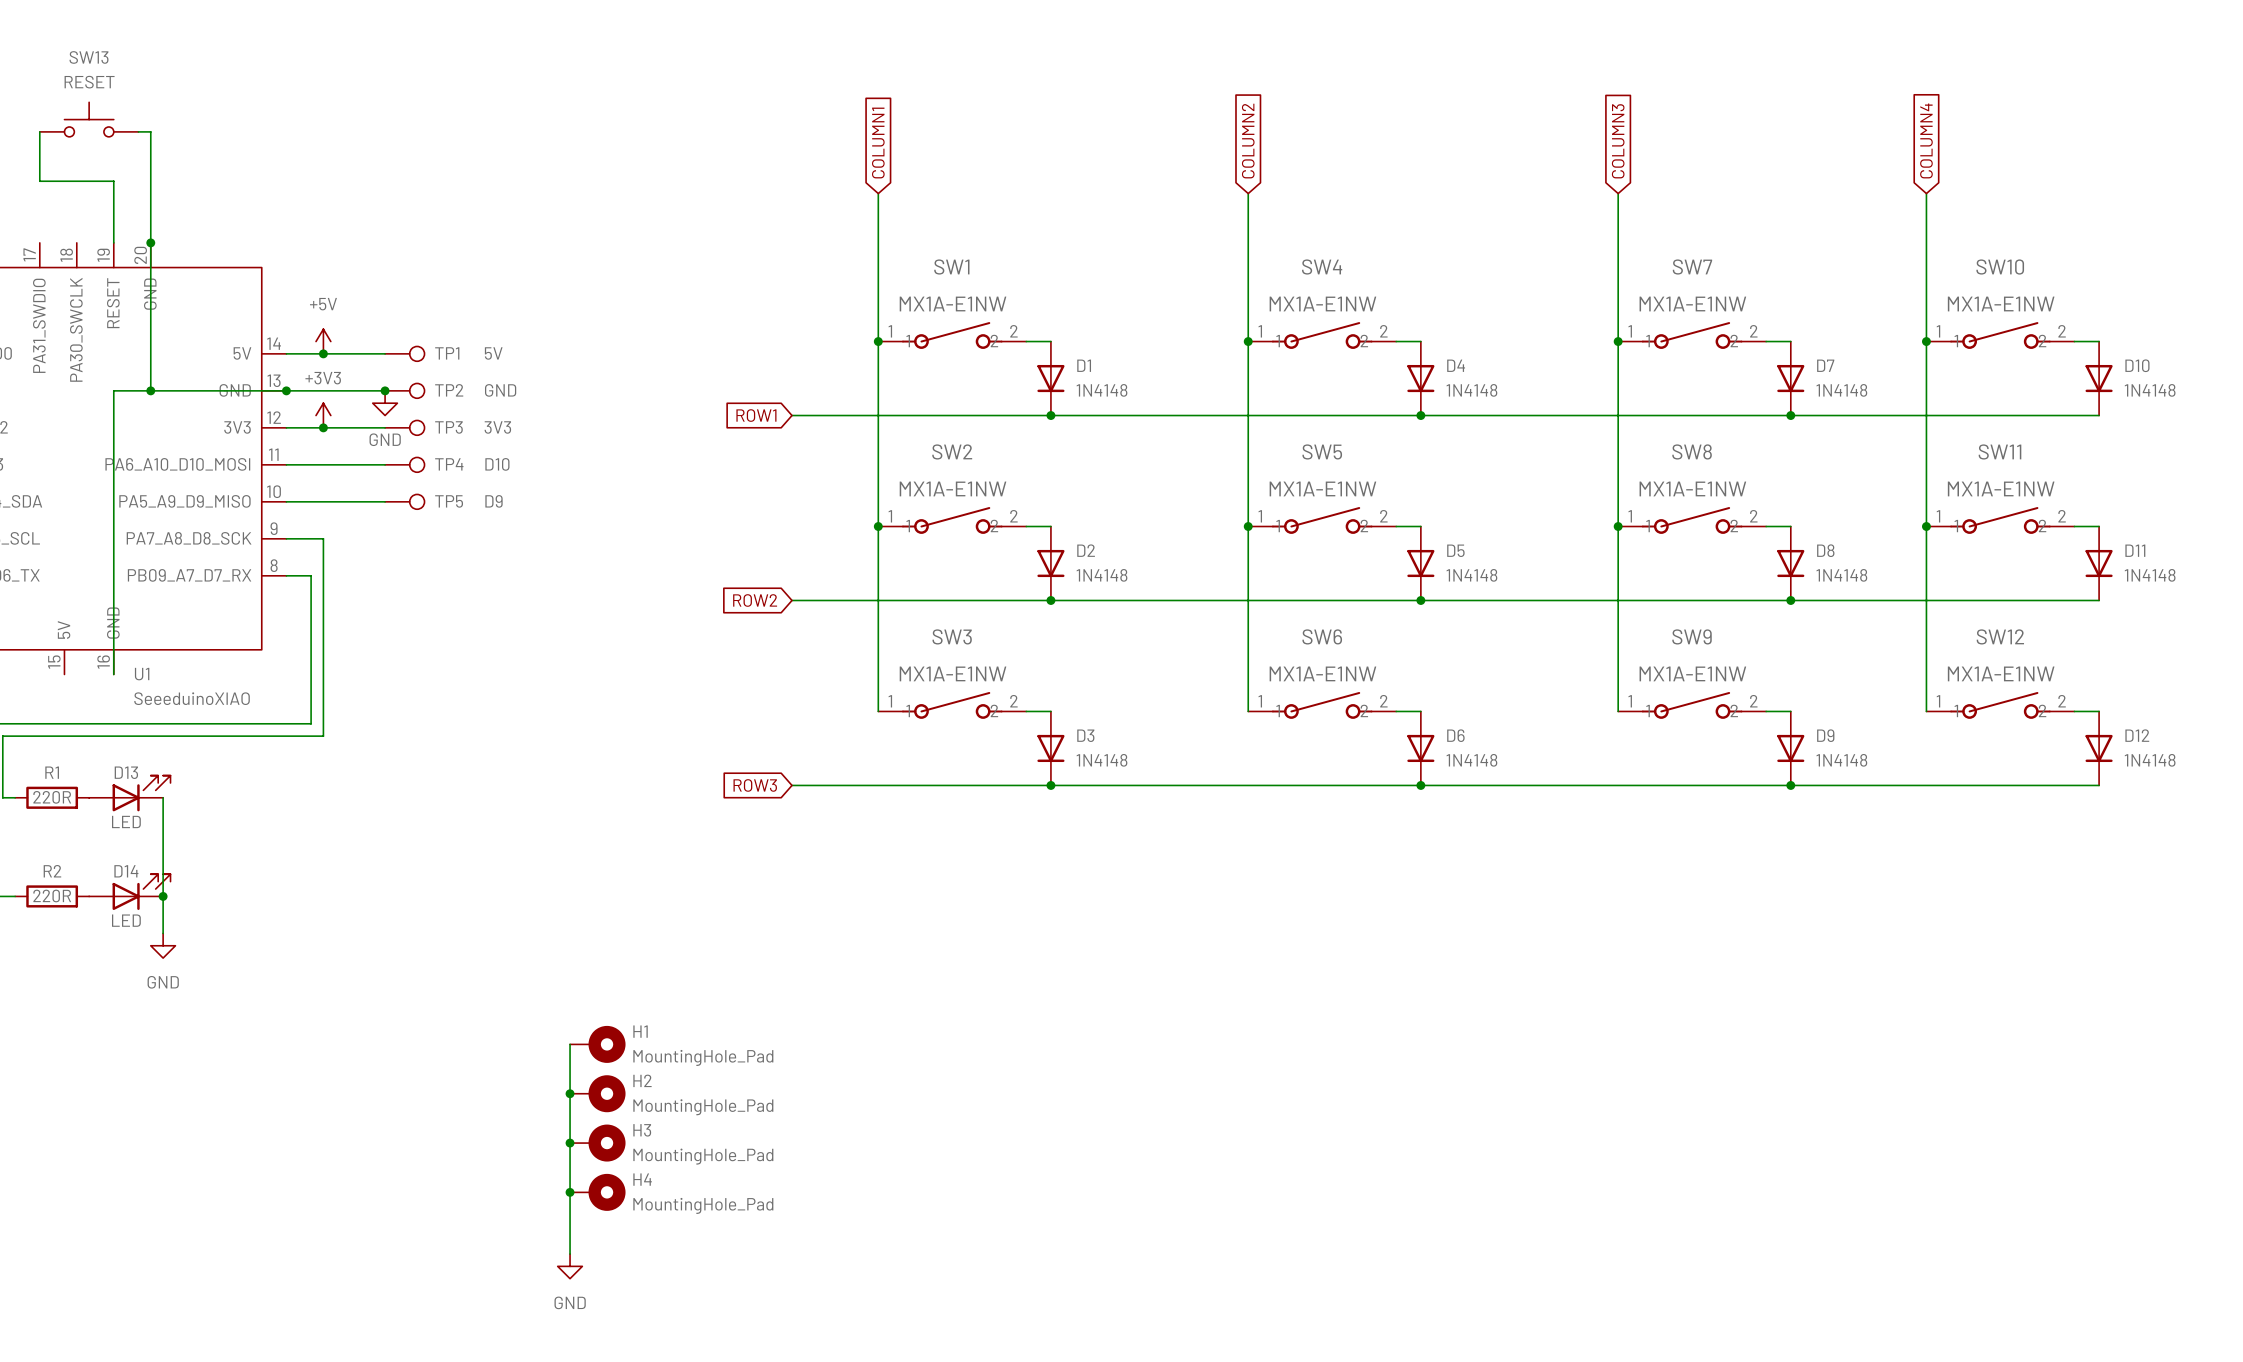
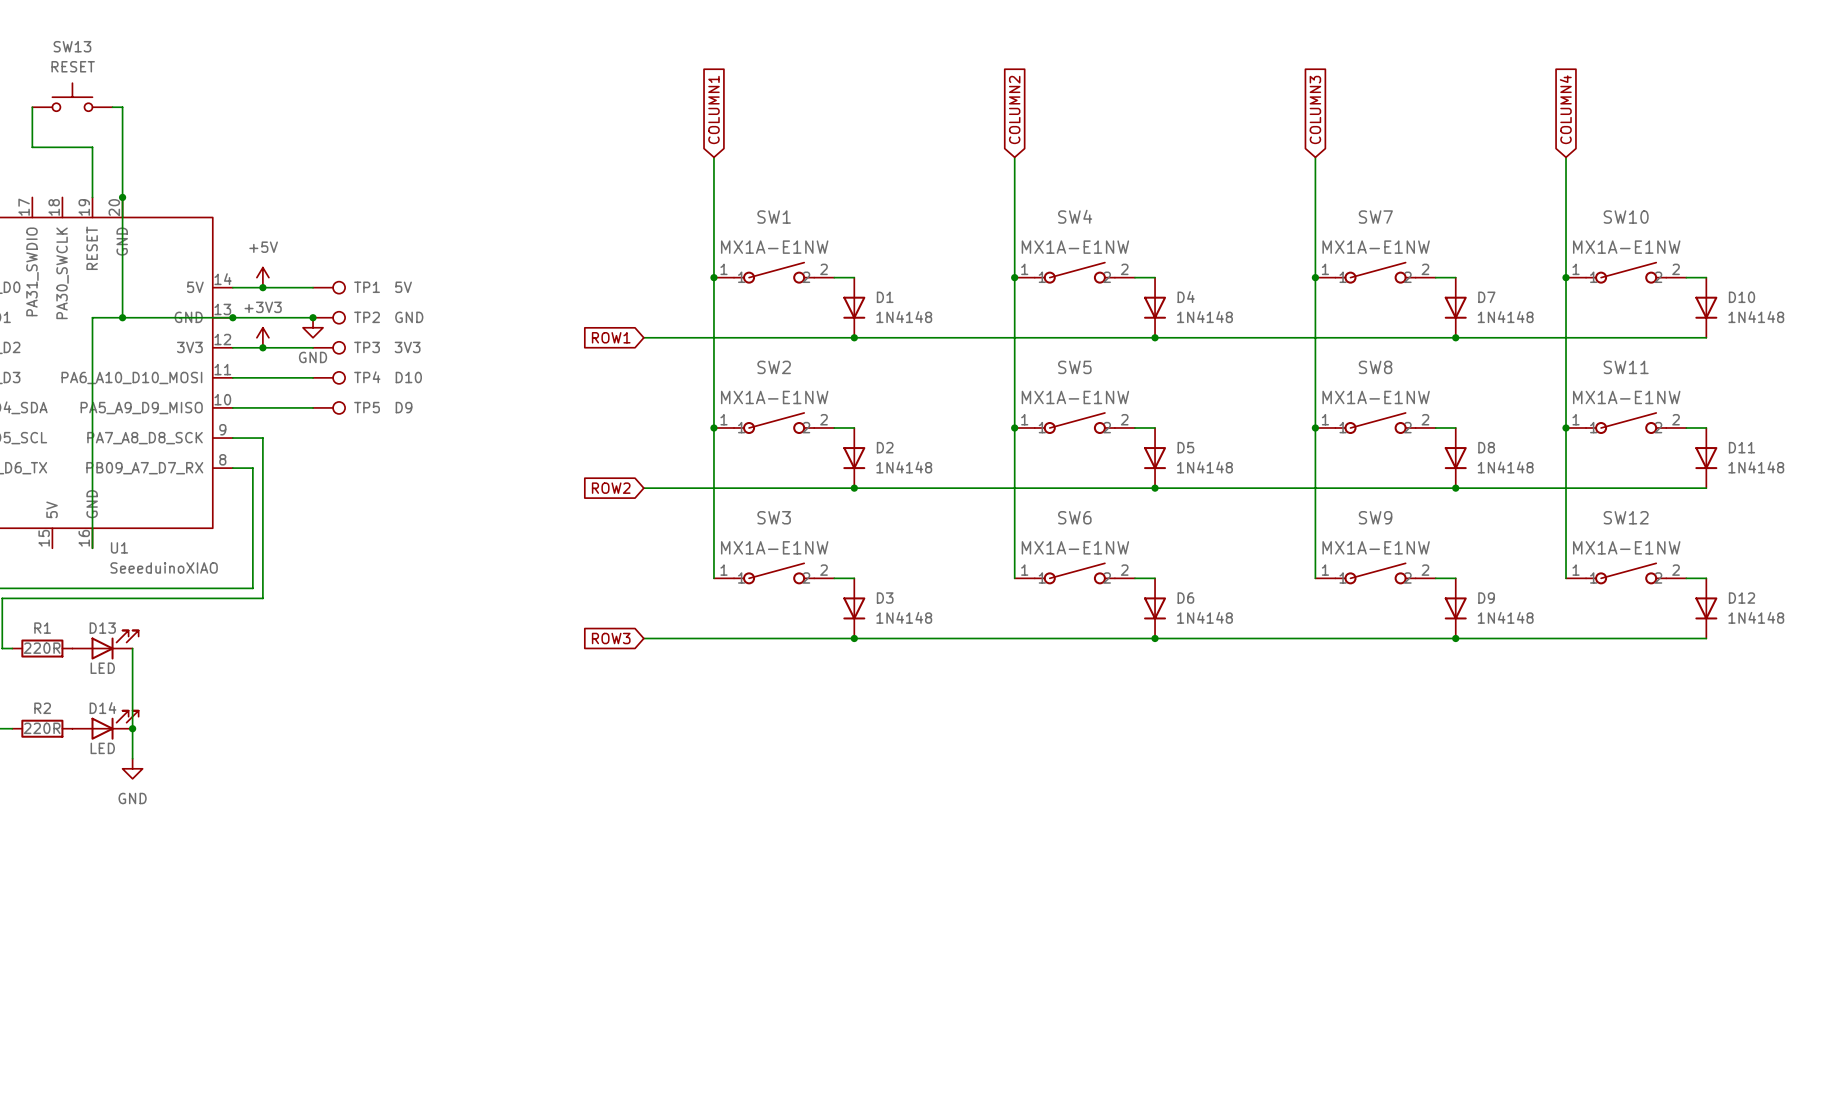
wire: (570, 1044) (570, 1254) -> none
H1: MountingHole_Pad (597, 1044) -> none
junction: (570, 1093) -> none
H2: MountingHole_Pad (597, 1093) -> none
junction: (570, 1143) -> none
H3: MountingHole_Pad (597, 1143) -> none
junction: (570, 1192) -> none
H4: MountingHole_Pad (597, 1192) -> none
power symbol: GND (570, 1266) -> none

